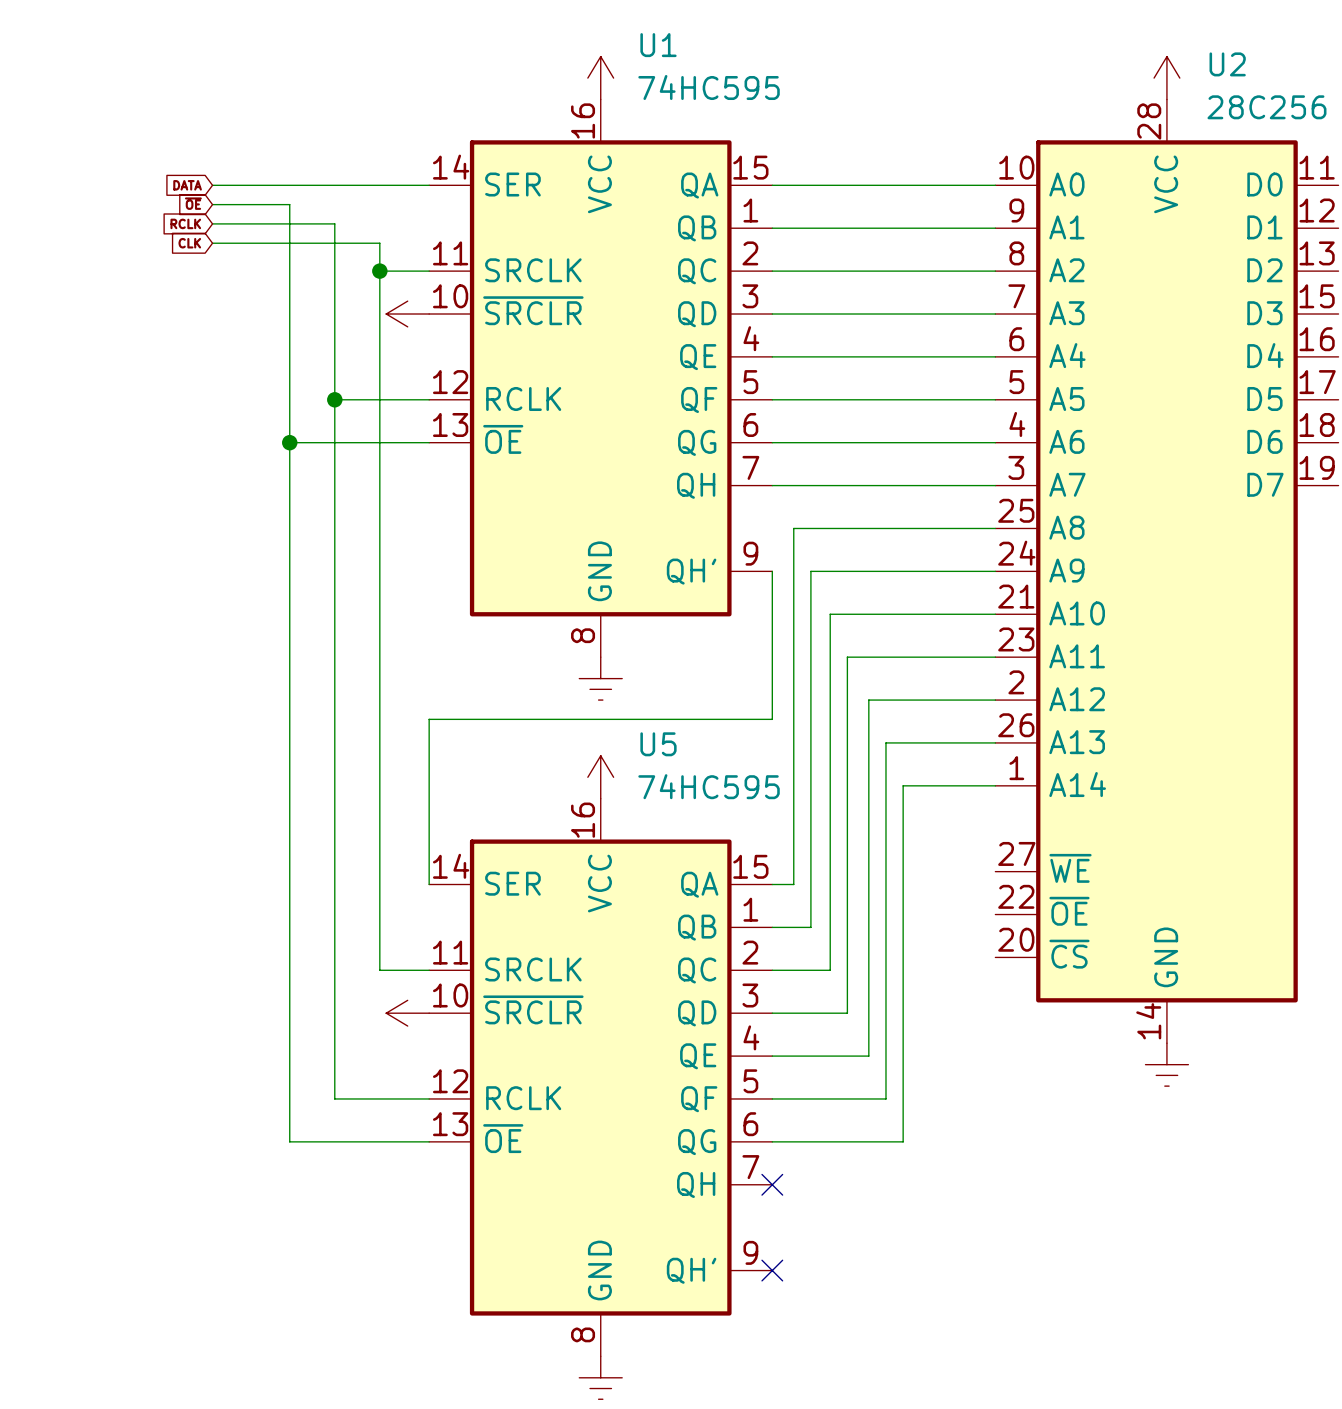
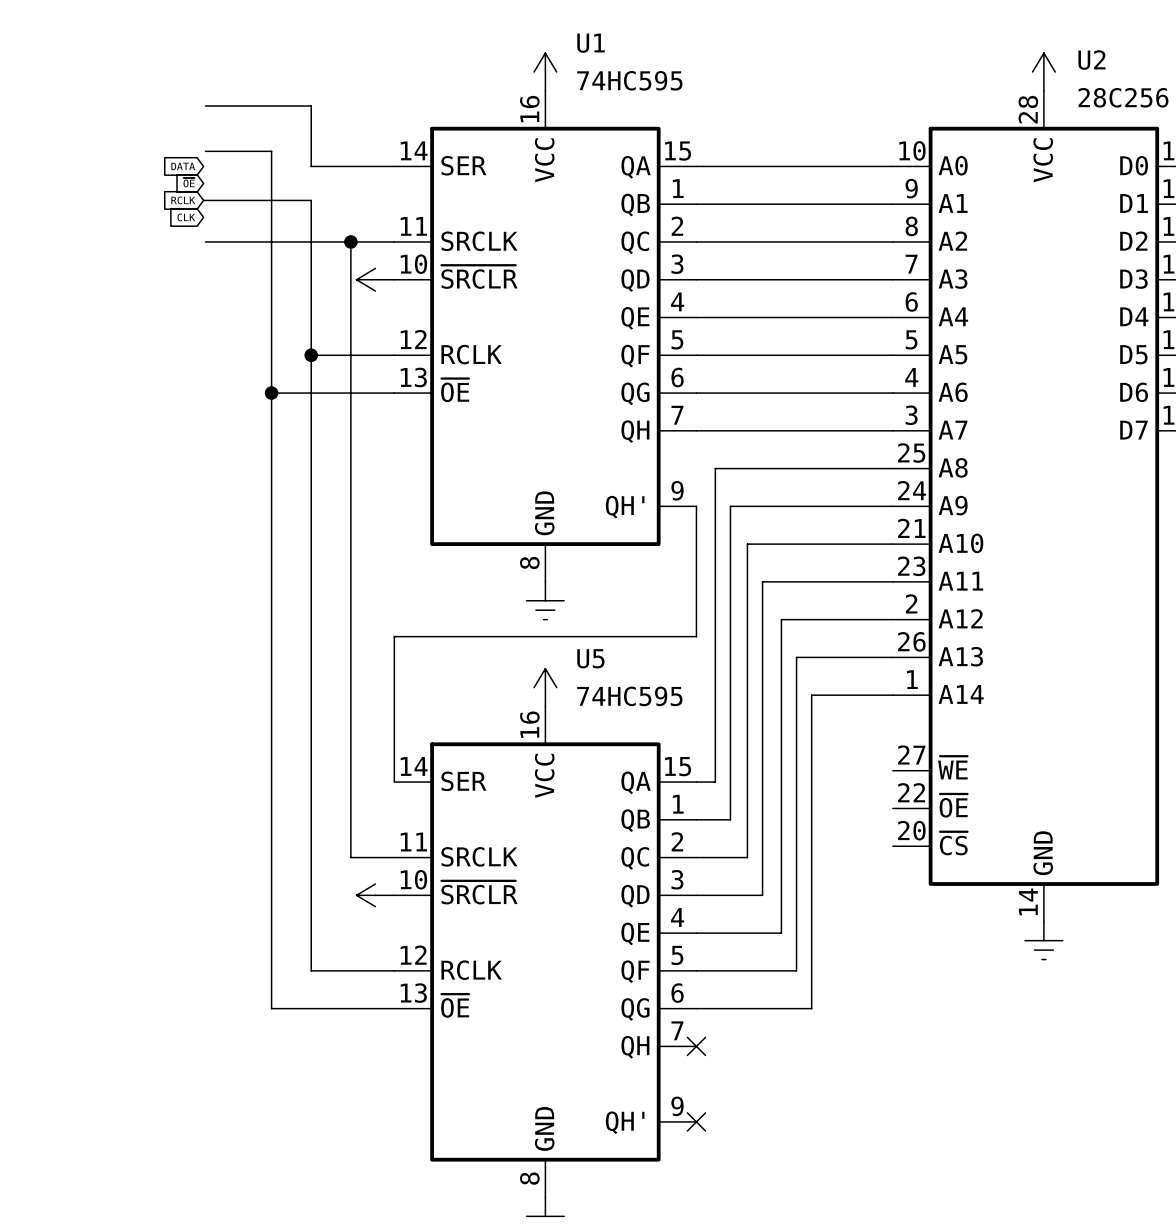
wire: (212, 185) (334, 185) -> (205, 106) (311, 106) (311, 166)
wire: (212, 204) (289, 204) -> (205, 151) (271, 151) (271, 183)
wire: (212, 243) (379, 243) (379, 271) -> (205, 241) (350, 241)

